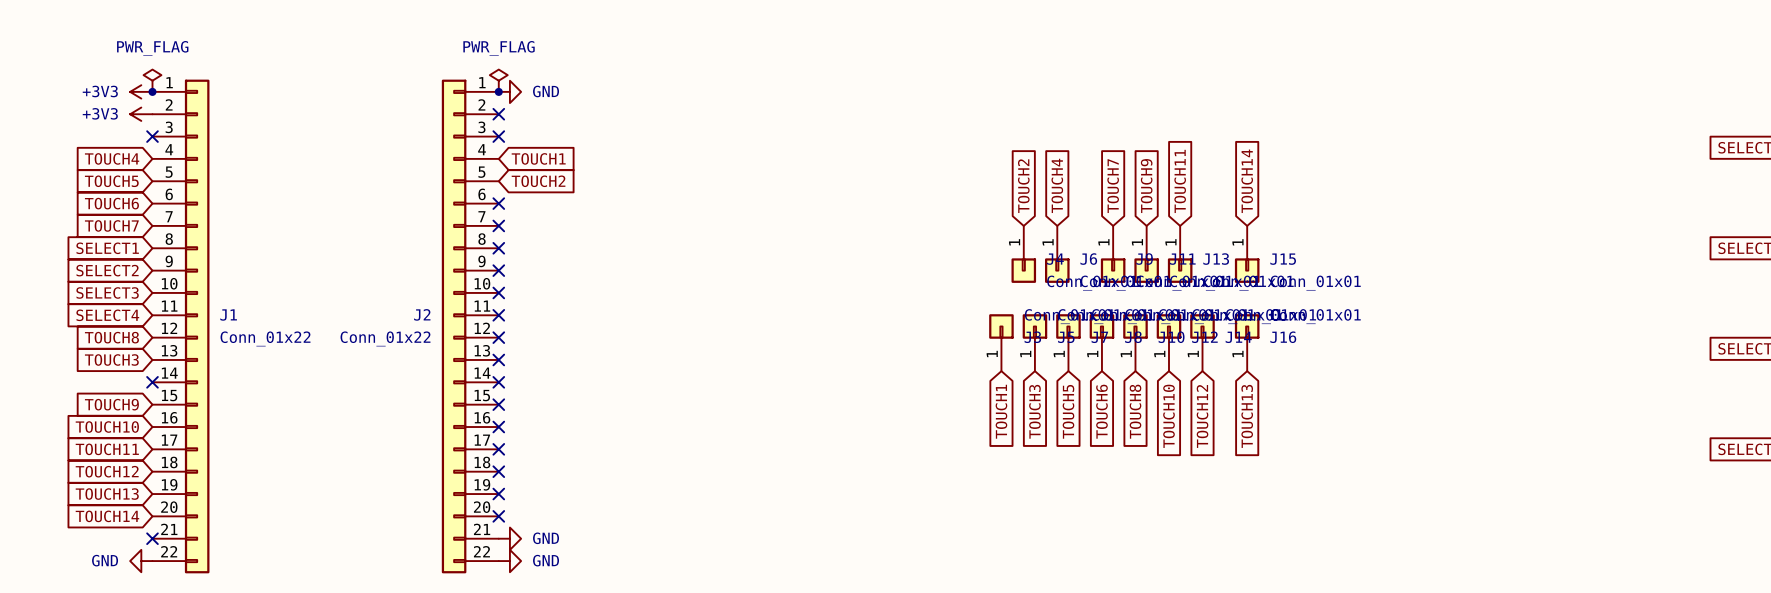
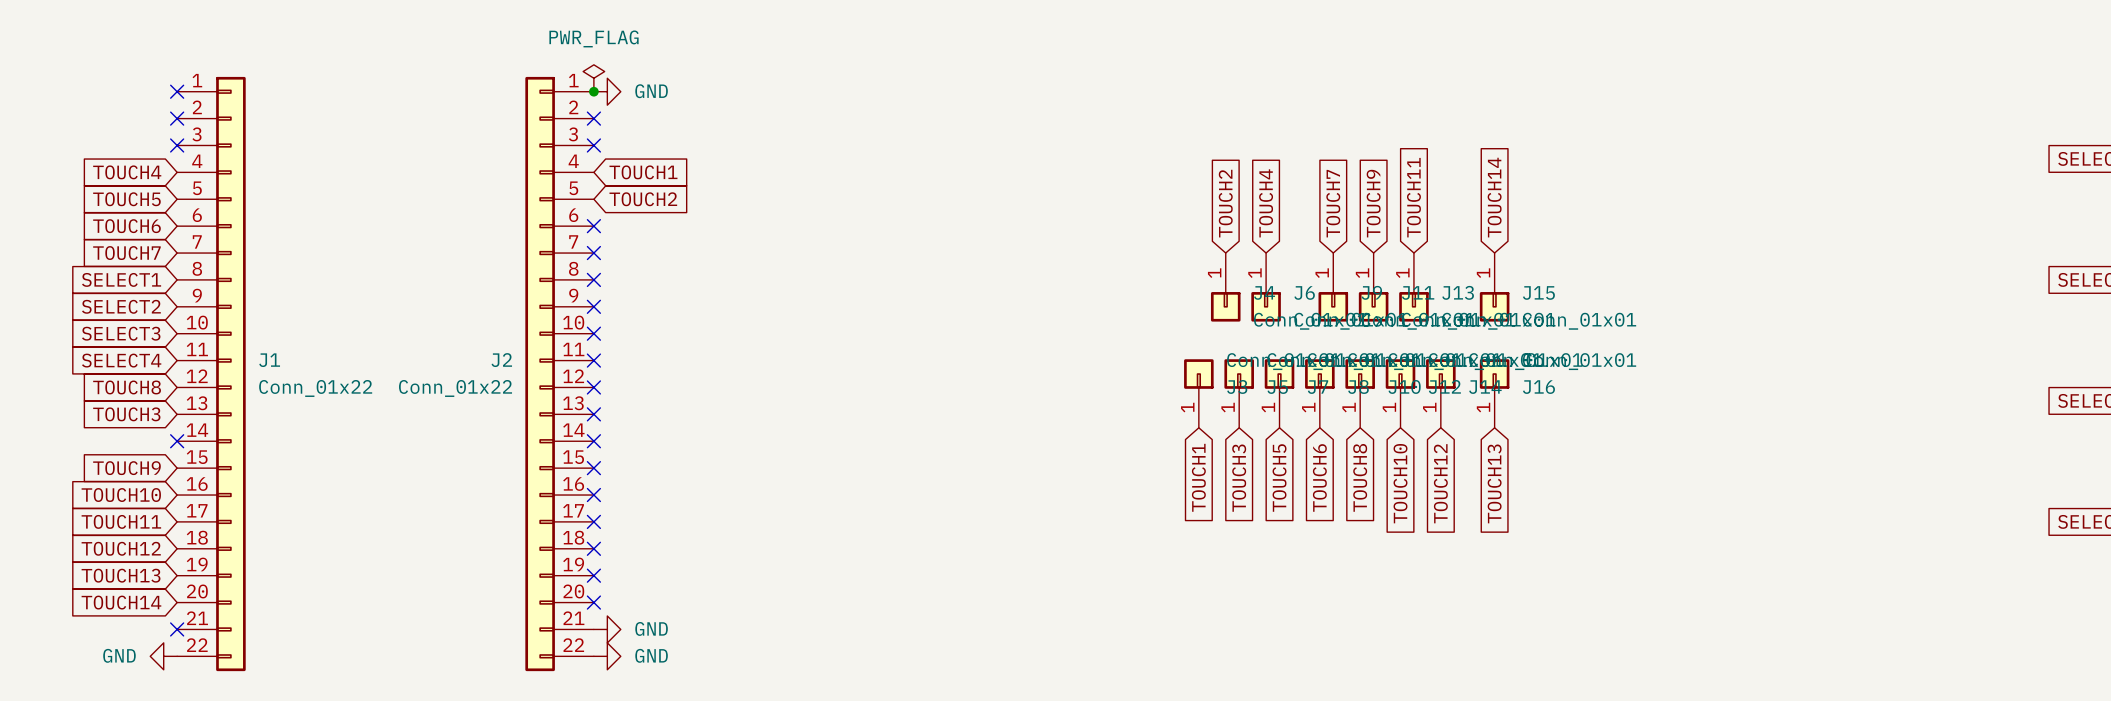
power symbol: PWR_FLAG (152, 80) -> none
power symbol: +3V3 (141, 91) -> none
junction: (152, 91) -> none
no-connect mark: none -> (177, 91)
power symbol: +3V3 (141, 114) -> none
no-connect mark: none -> (177, 118)

